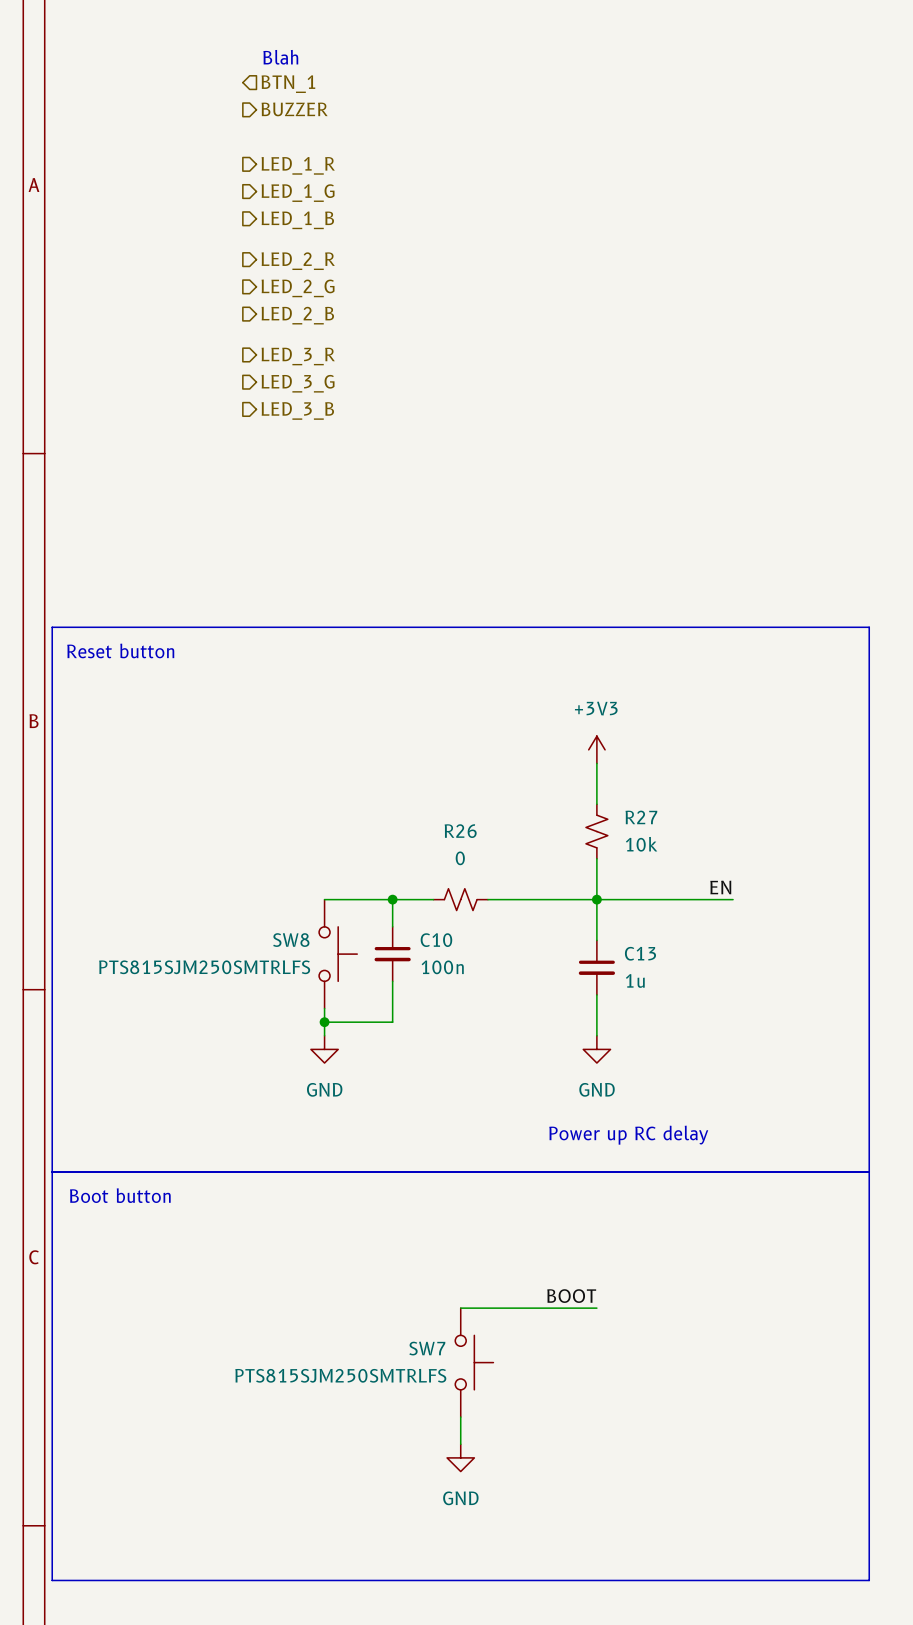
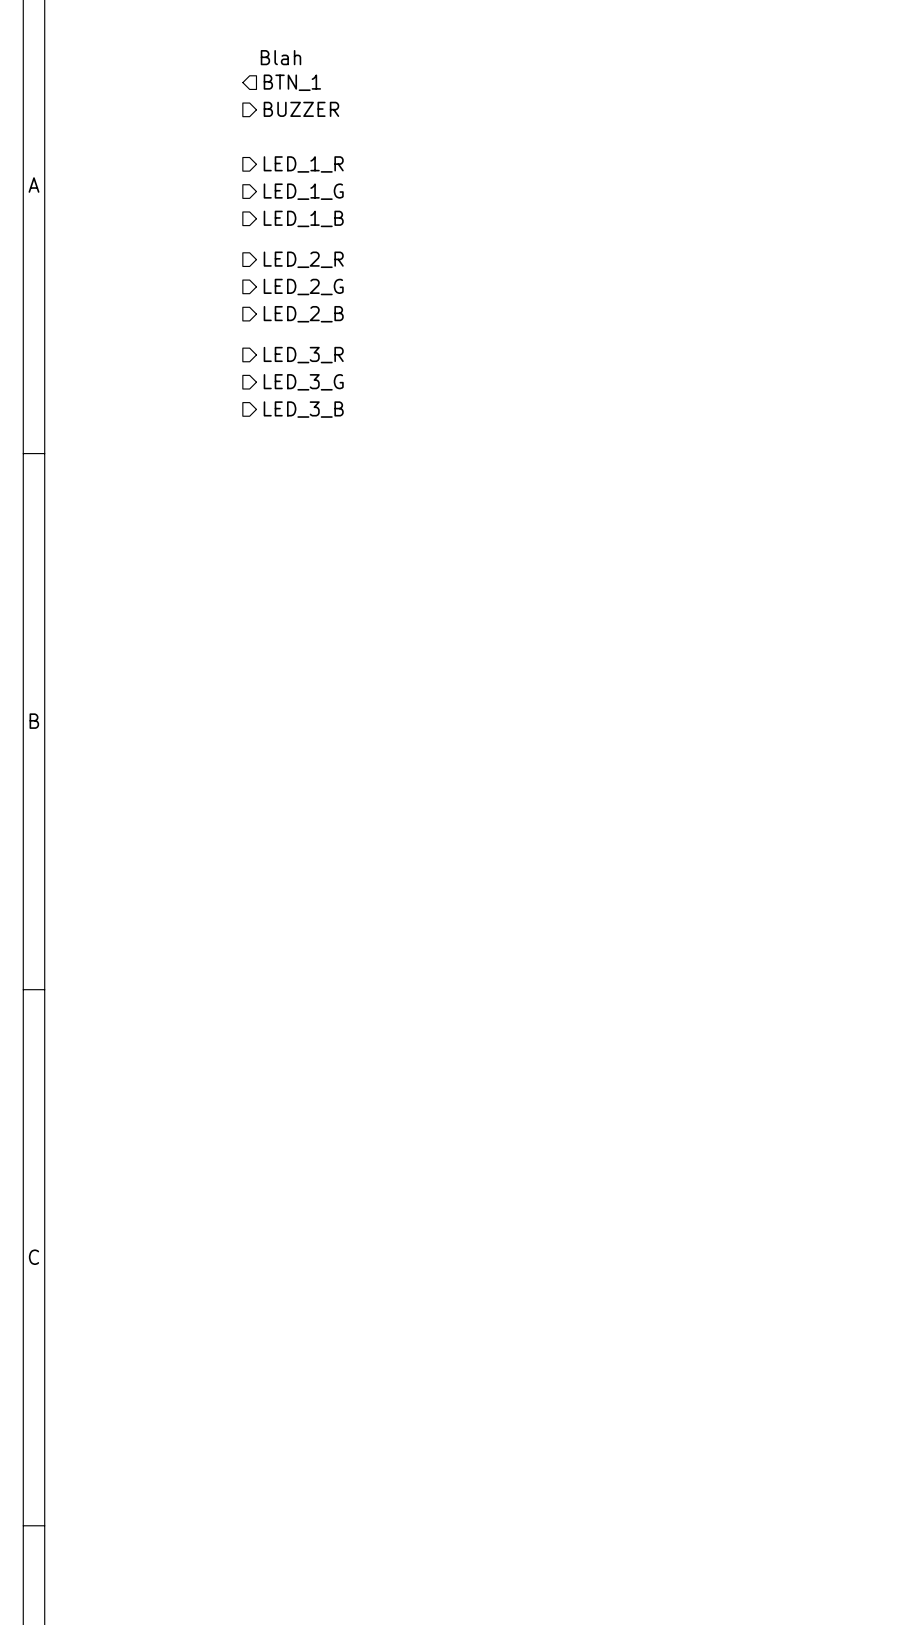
line: (52, 627) (52, 1580) (869, 1580) (869, 627) (52, 627) -> none
text: Reset button (120, 650) -> none
power symbol: +3V3 (596, 749) -> none
wire: (596, 763) (596, 804) -> none
R27: 10k (596, 831) -> none
wire: (596, 858) (596, 940) -> none
label: EN (720, 887) -> none
wire: (324, 899) (433, 899) -> none
wire: (392, 899) (392, 926) -> none
junction: (392, 899) -> none
R26: 0 (460, 899) -> none
wire: (487, 899) (733, 899) -> none
junction: (596, 899) -> none
SW8: PTS815SJM250SMTRLFS (338, 954) -> none
C10: 100n (392, 954) -> none
C13: 1u (596, 967) -> none
wire: (392, 981) (392, 1022) (324, 1022) -> none
wire: (596, 994) (596, 1035) -> none
wire: (324, 1008) (324, 1035) -> none
junction: (324, 1022) -> none
power symbol: GND (324, 1049) -> none
power symbol: GND (596, 1049) -> none
text: Power up RC delay (628, 1135) -> none
line: (52, 1171) (869, 1171) -> none
text: Boot button (120, 1195) -> none
label: BOOT (571, 1296) -> none
wire: (460, 1308) (596, 1308) -> none
SW7: PTS815SJM250SMTRLFS (474, 1362) -> none
wire: (460, 1417) (460, 1444) -> none
power symbol: GND (460, 1457) -> none

